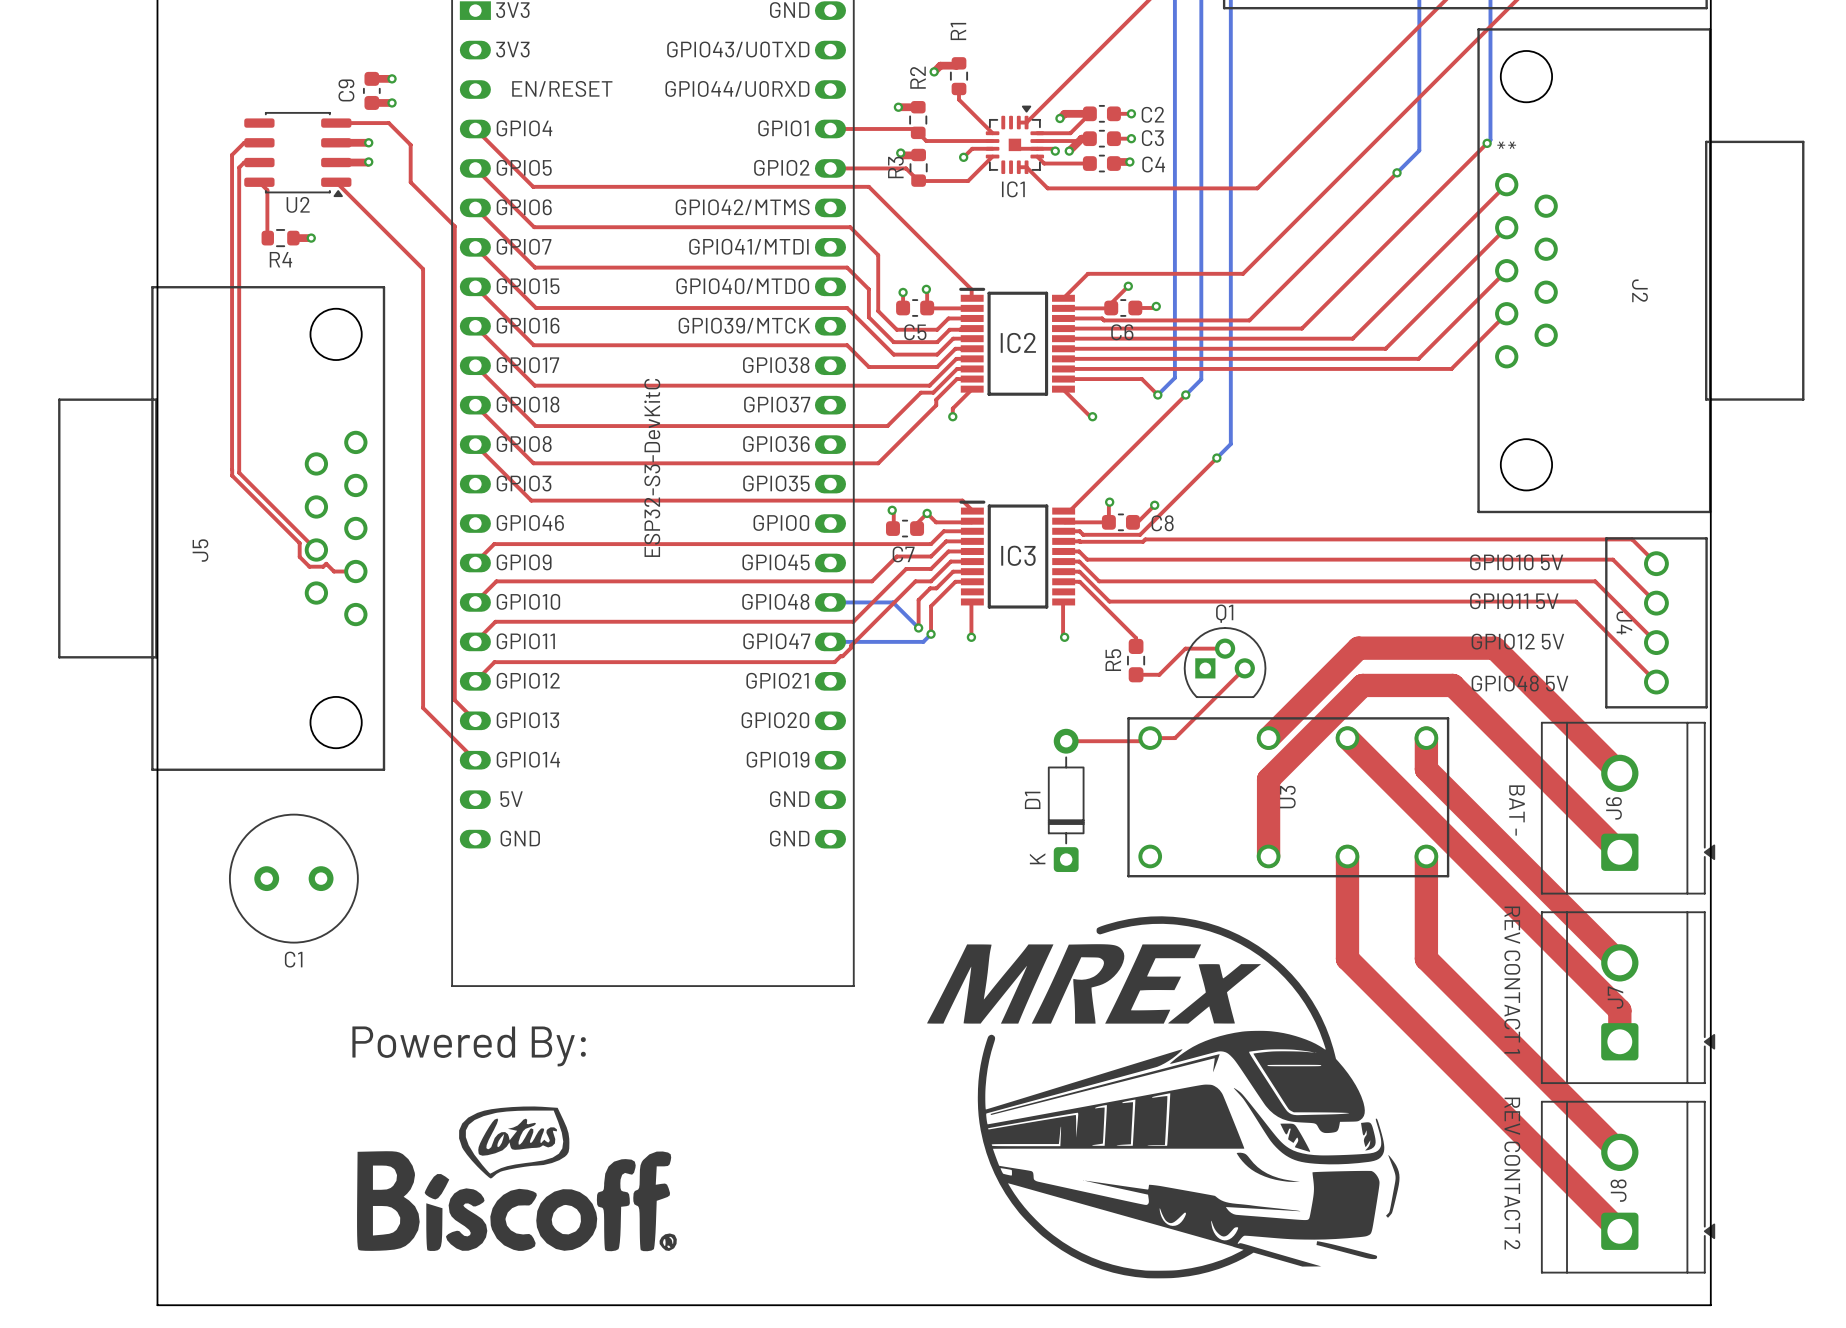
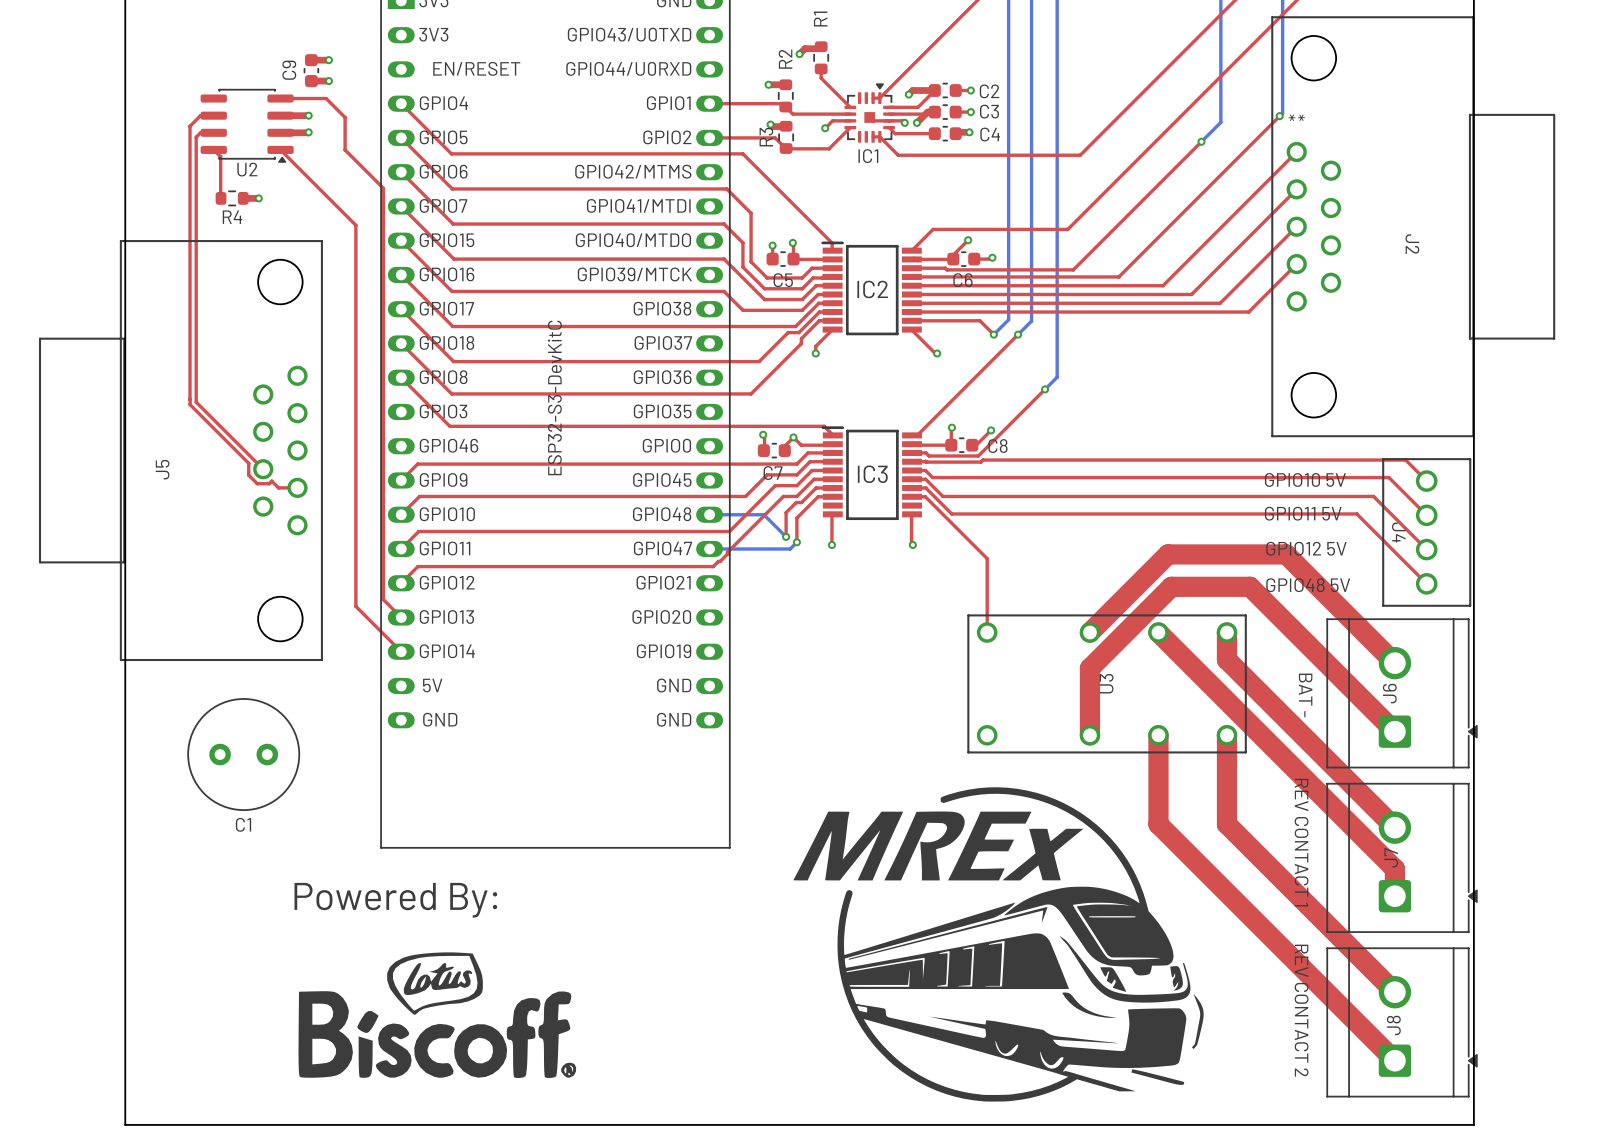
top track: (1079, 581) (1136, 638) (1136, 646) -> (925, 496) (987, 558) (987, 632)
top track: (1225, 648) (1185, 648) (1159, 674) (1136, 674) -> none
R5: (1136, 660) -> none
Q1: (1225, 662) -> none
top track: (1244, 668) (1175, 738) (1150, 738) -> none
top track: (1143, 738) (1140, 741) (1066, 741) -> none
D1: (1066, 800) -> none

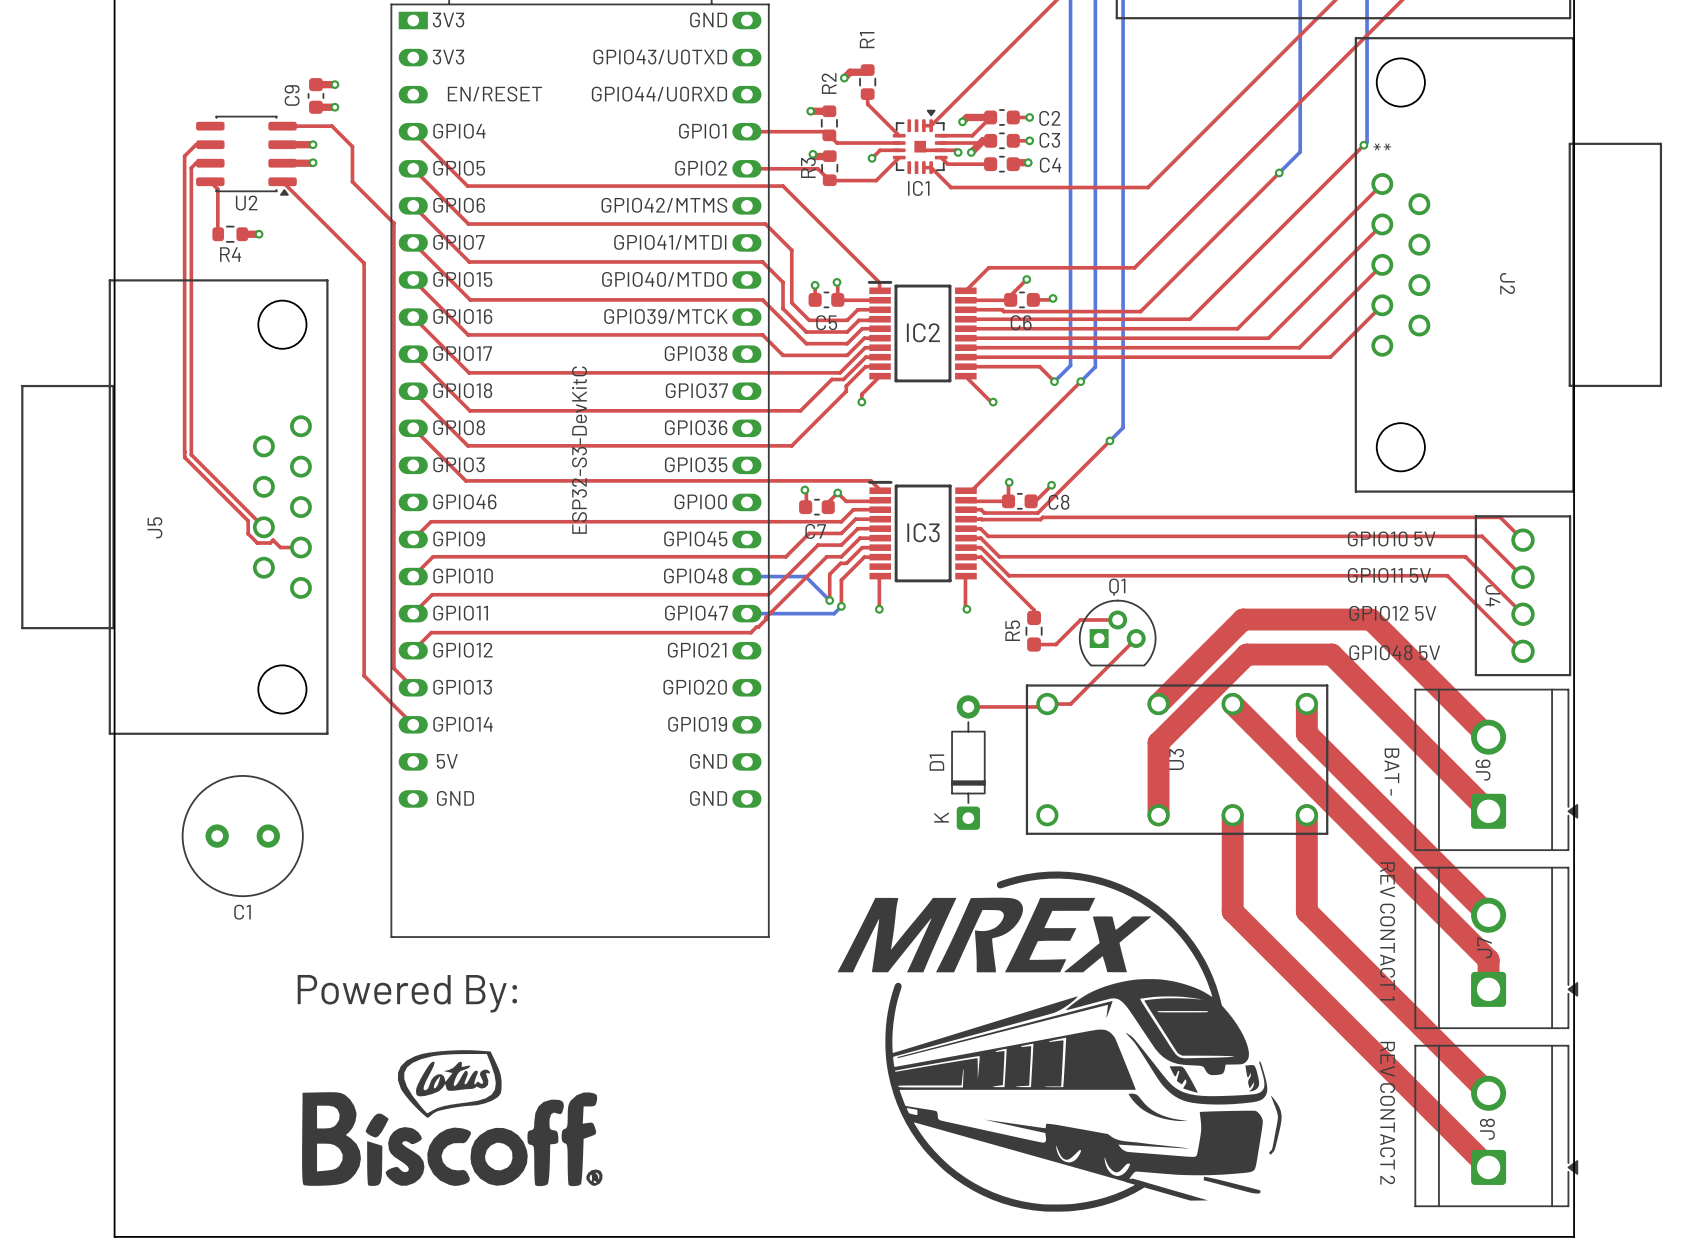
top track: (925, 496) (987, 558) (987, 632) -> (980, 557) (1034, 610) (1034, 617)
top track: none -> (1117, 619) (1080, 619) (1055, 644) (1034, 644)
R5: none -> (1034, 631)
Q1: none -> (1117, 633)
top track: none -> (1136, 638) (1070, 704) (1047, 704)
top track: none -> (1040, 704) (1037, 706) (968, 706)
D1: none -> (968, 762)

